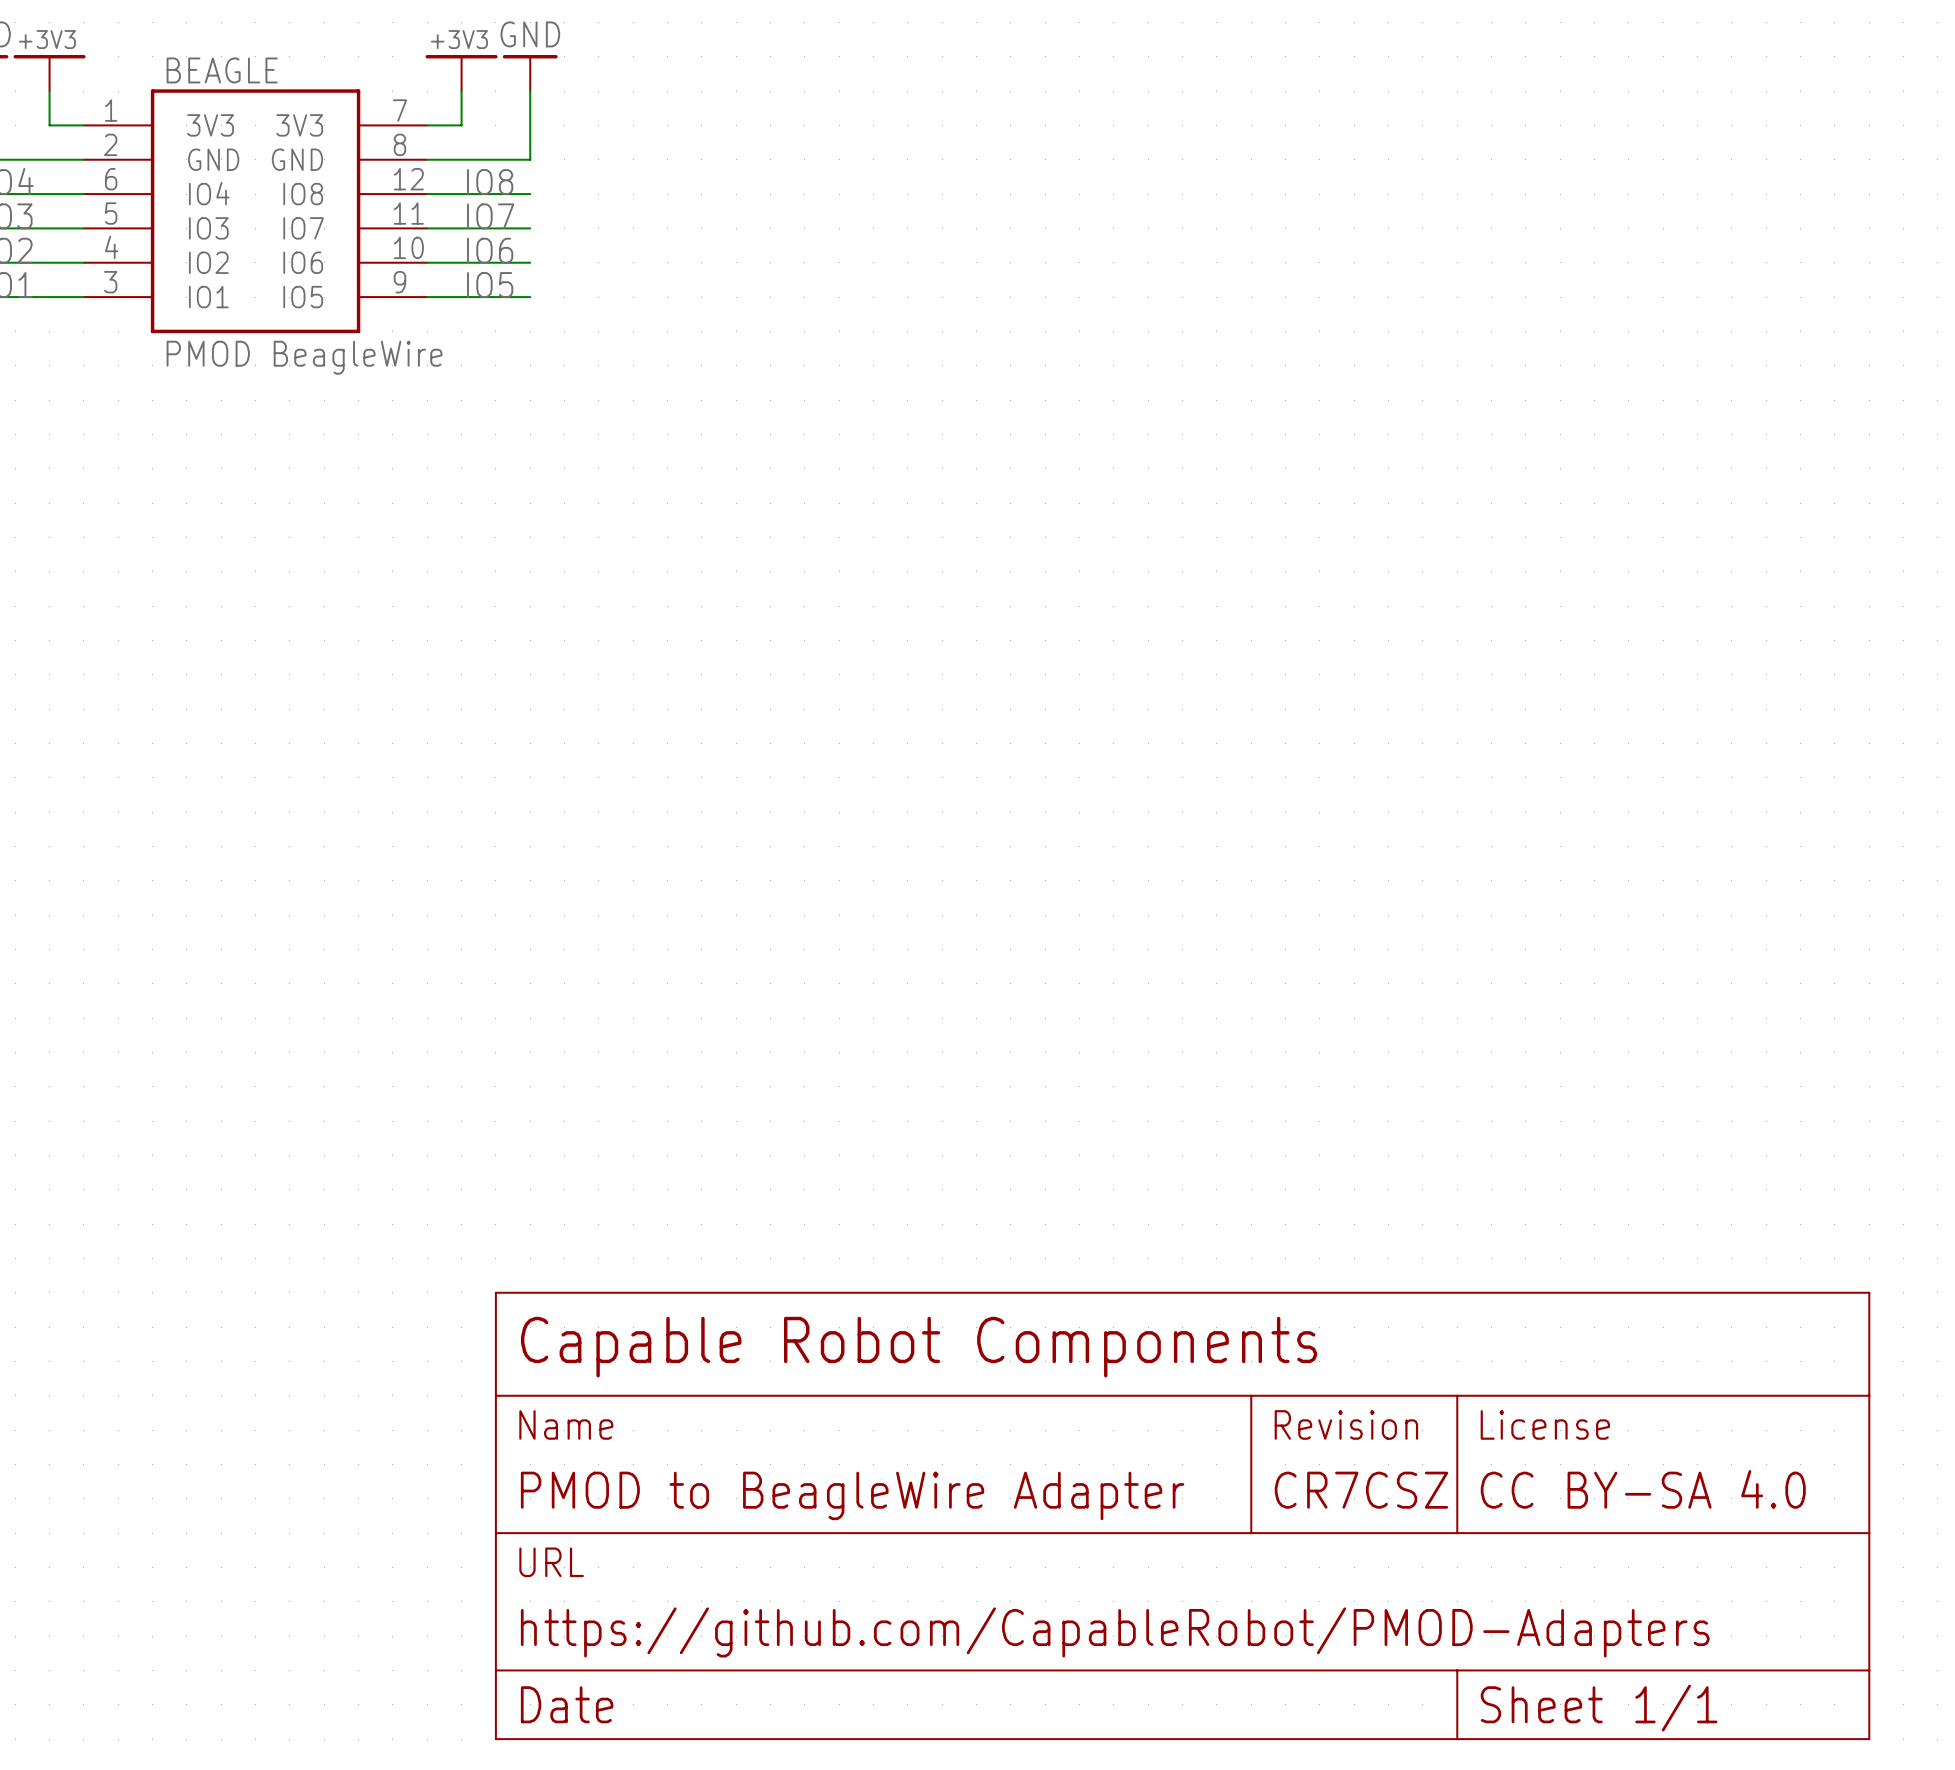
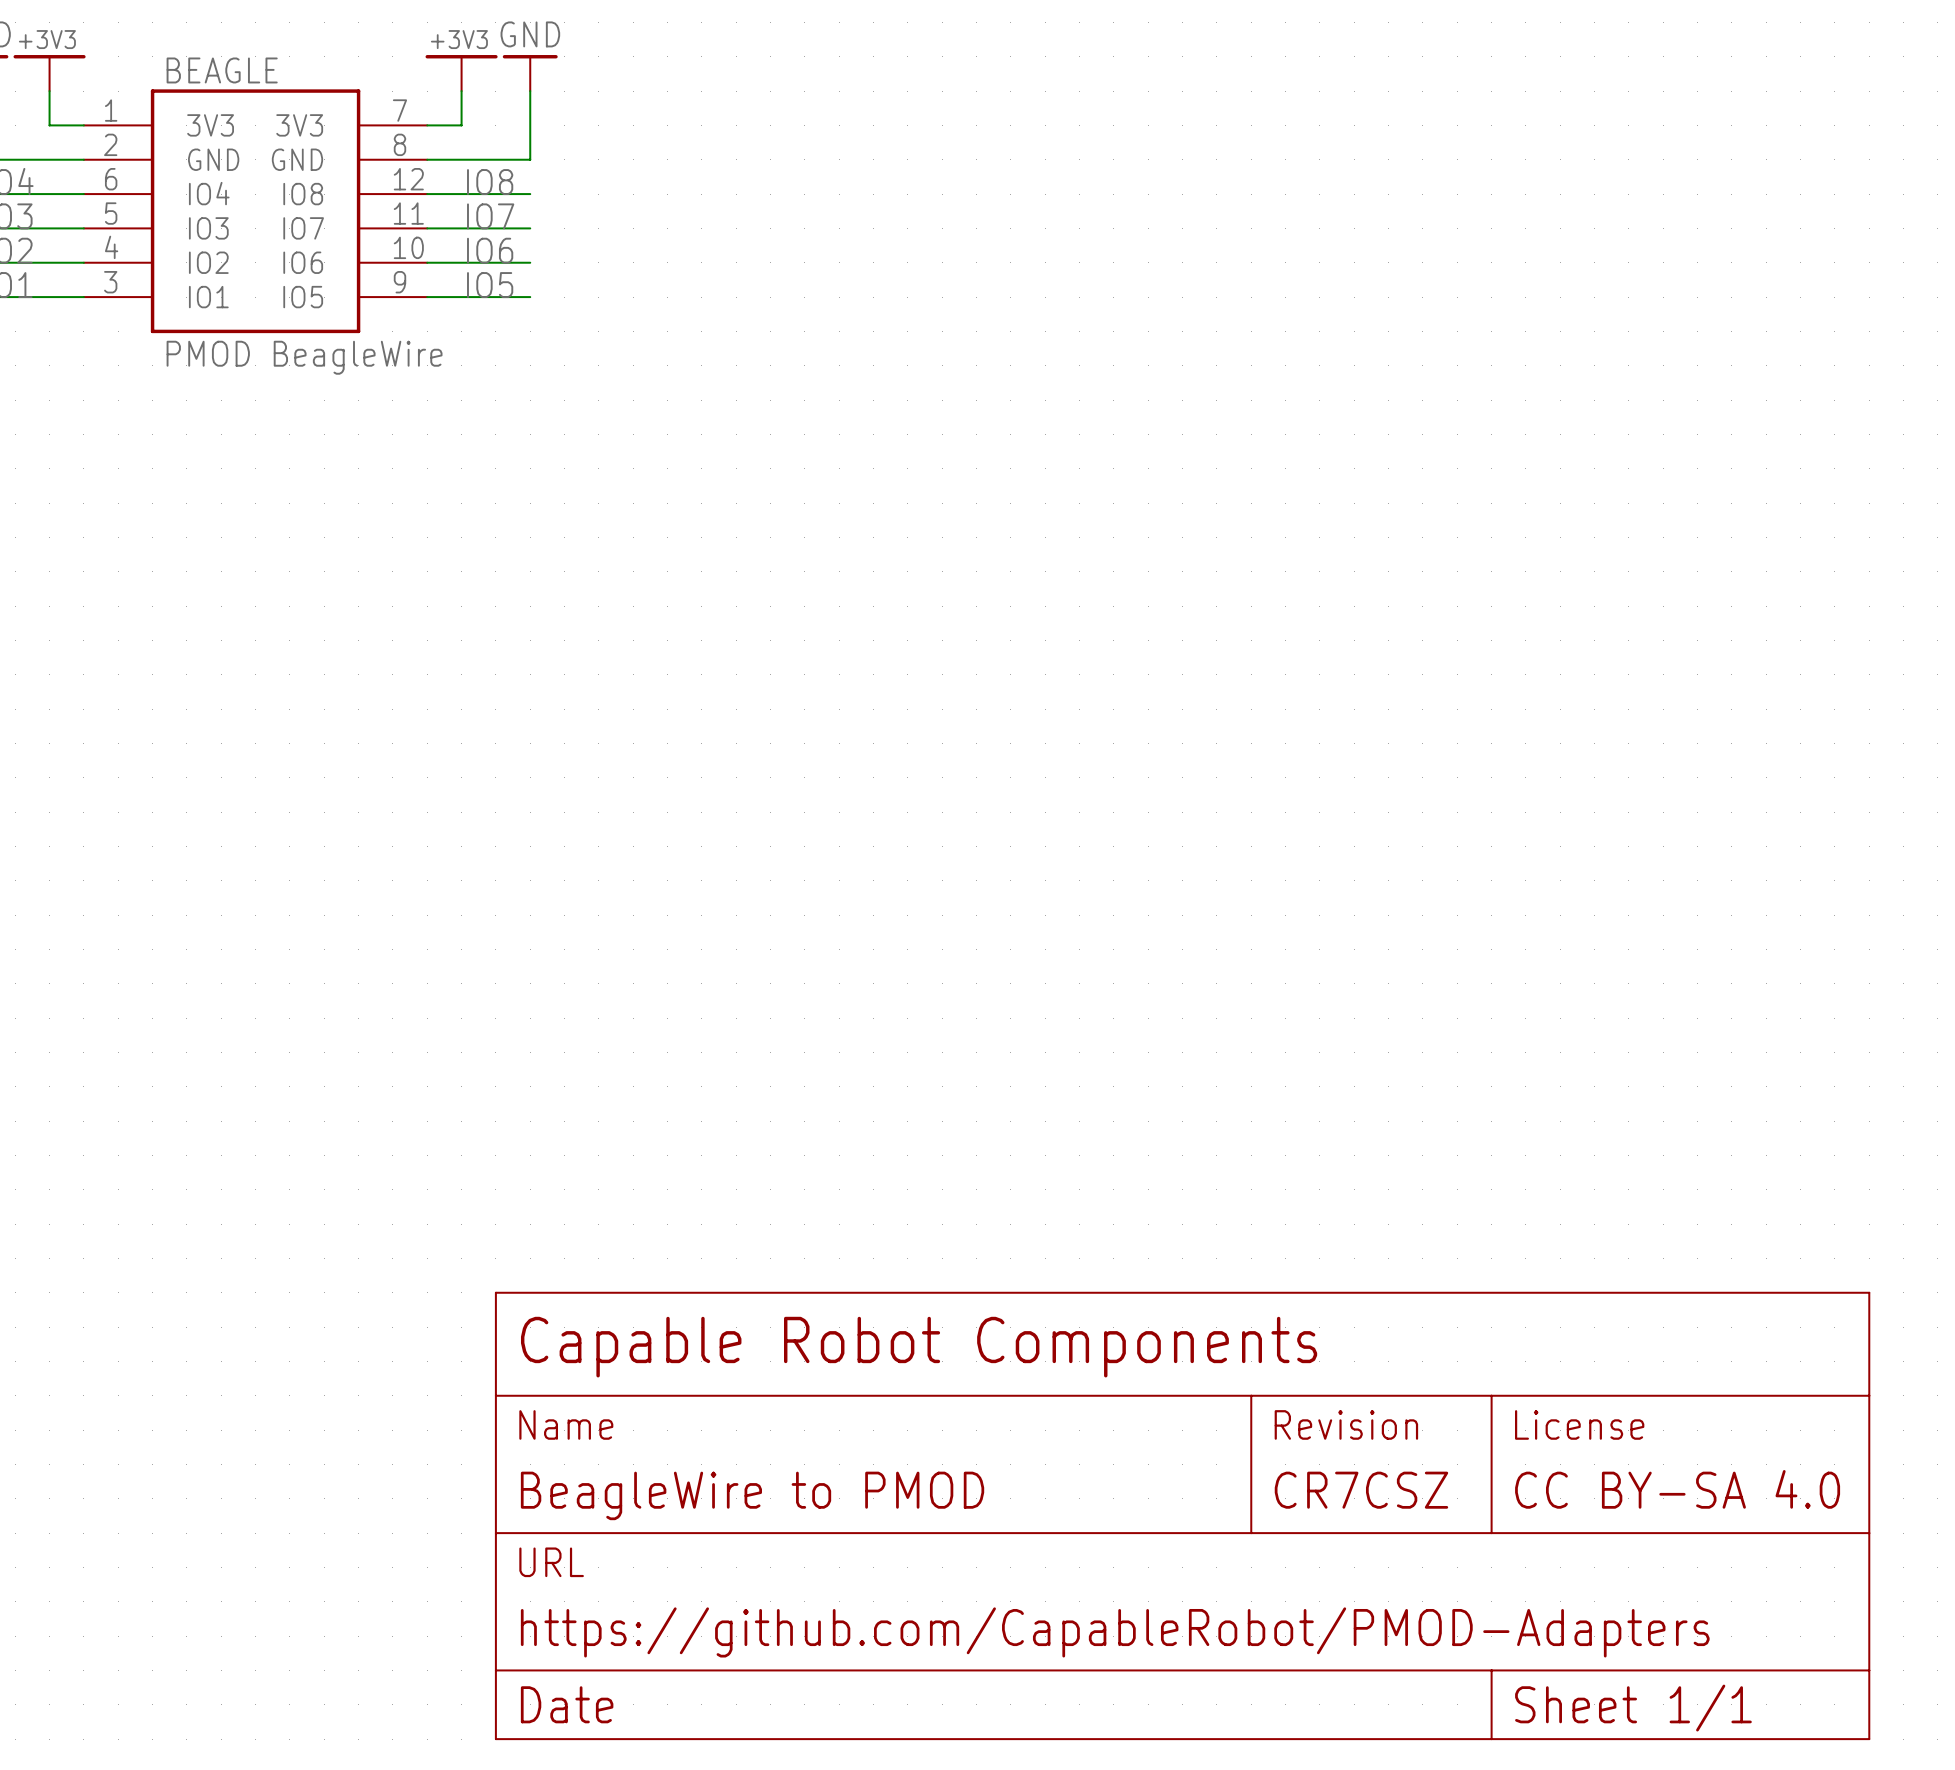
part symbol: [495, 1292, 1870, 1740] -> [495, 1292, 1870, 1740]
part text position: CC BY-SA 4.0 (1643, 1489) -> CC BY-SA 4.0 (1677, 1489)
part text: PMOD to BeagleWire Adapter (852, 1495) -> BeagleWire to PMOD (752, 1495)
part text position: 1/1 (1676, 1708) -> 1/1 (1710, 1708)

